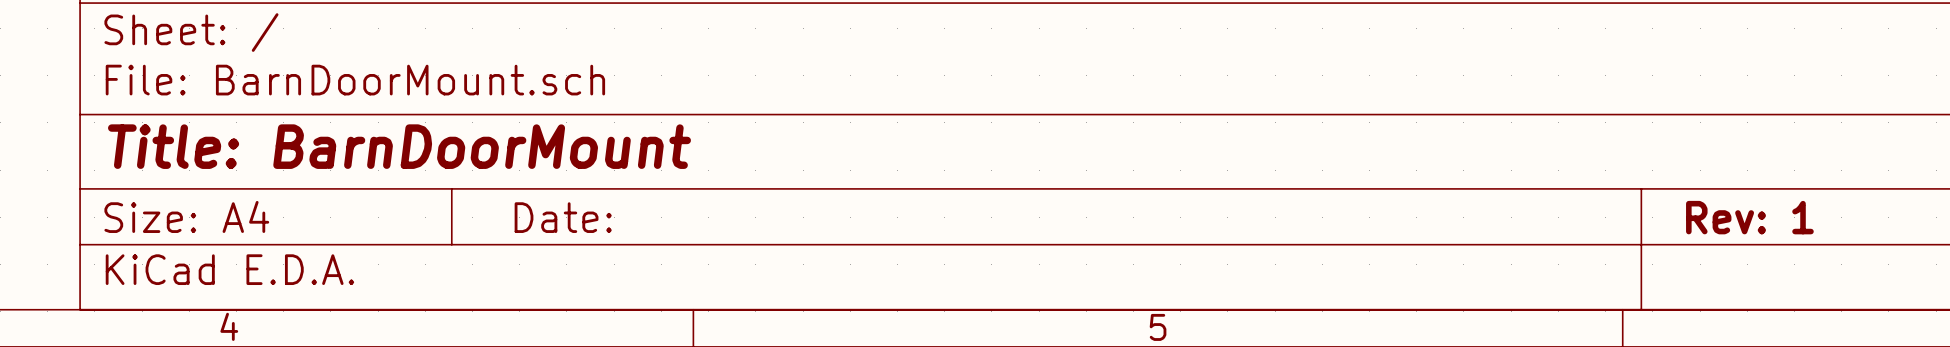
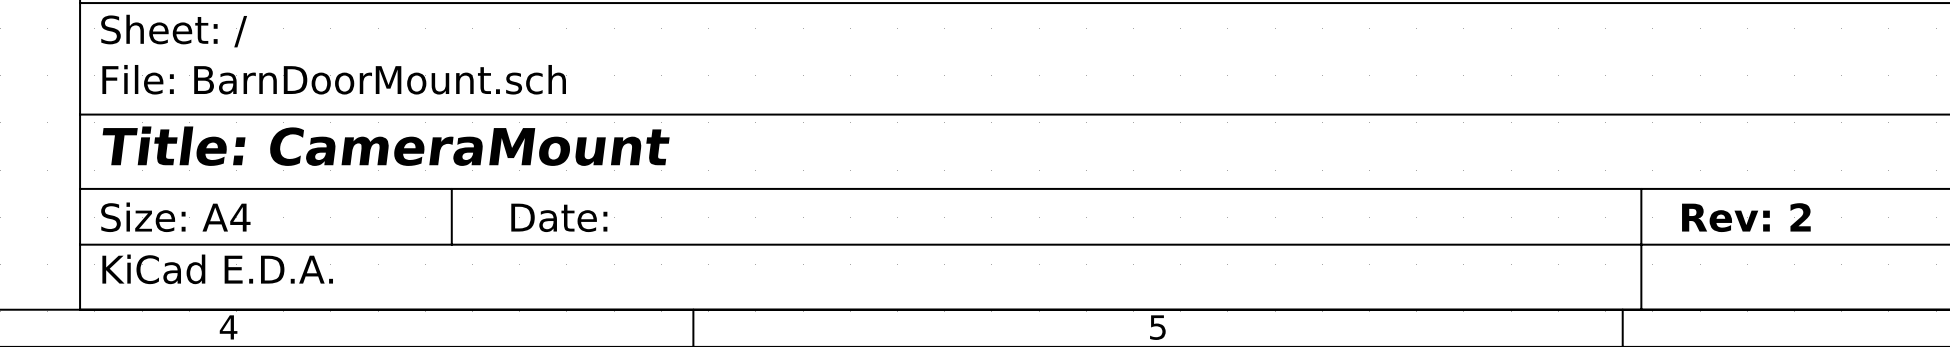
title block: Title: BarnDoorMount (399, 146) -> Title: CameraMount (386, 146)
title block: Rev: 1 (1749, 217) -> Rev: 2 (1746, 217)

